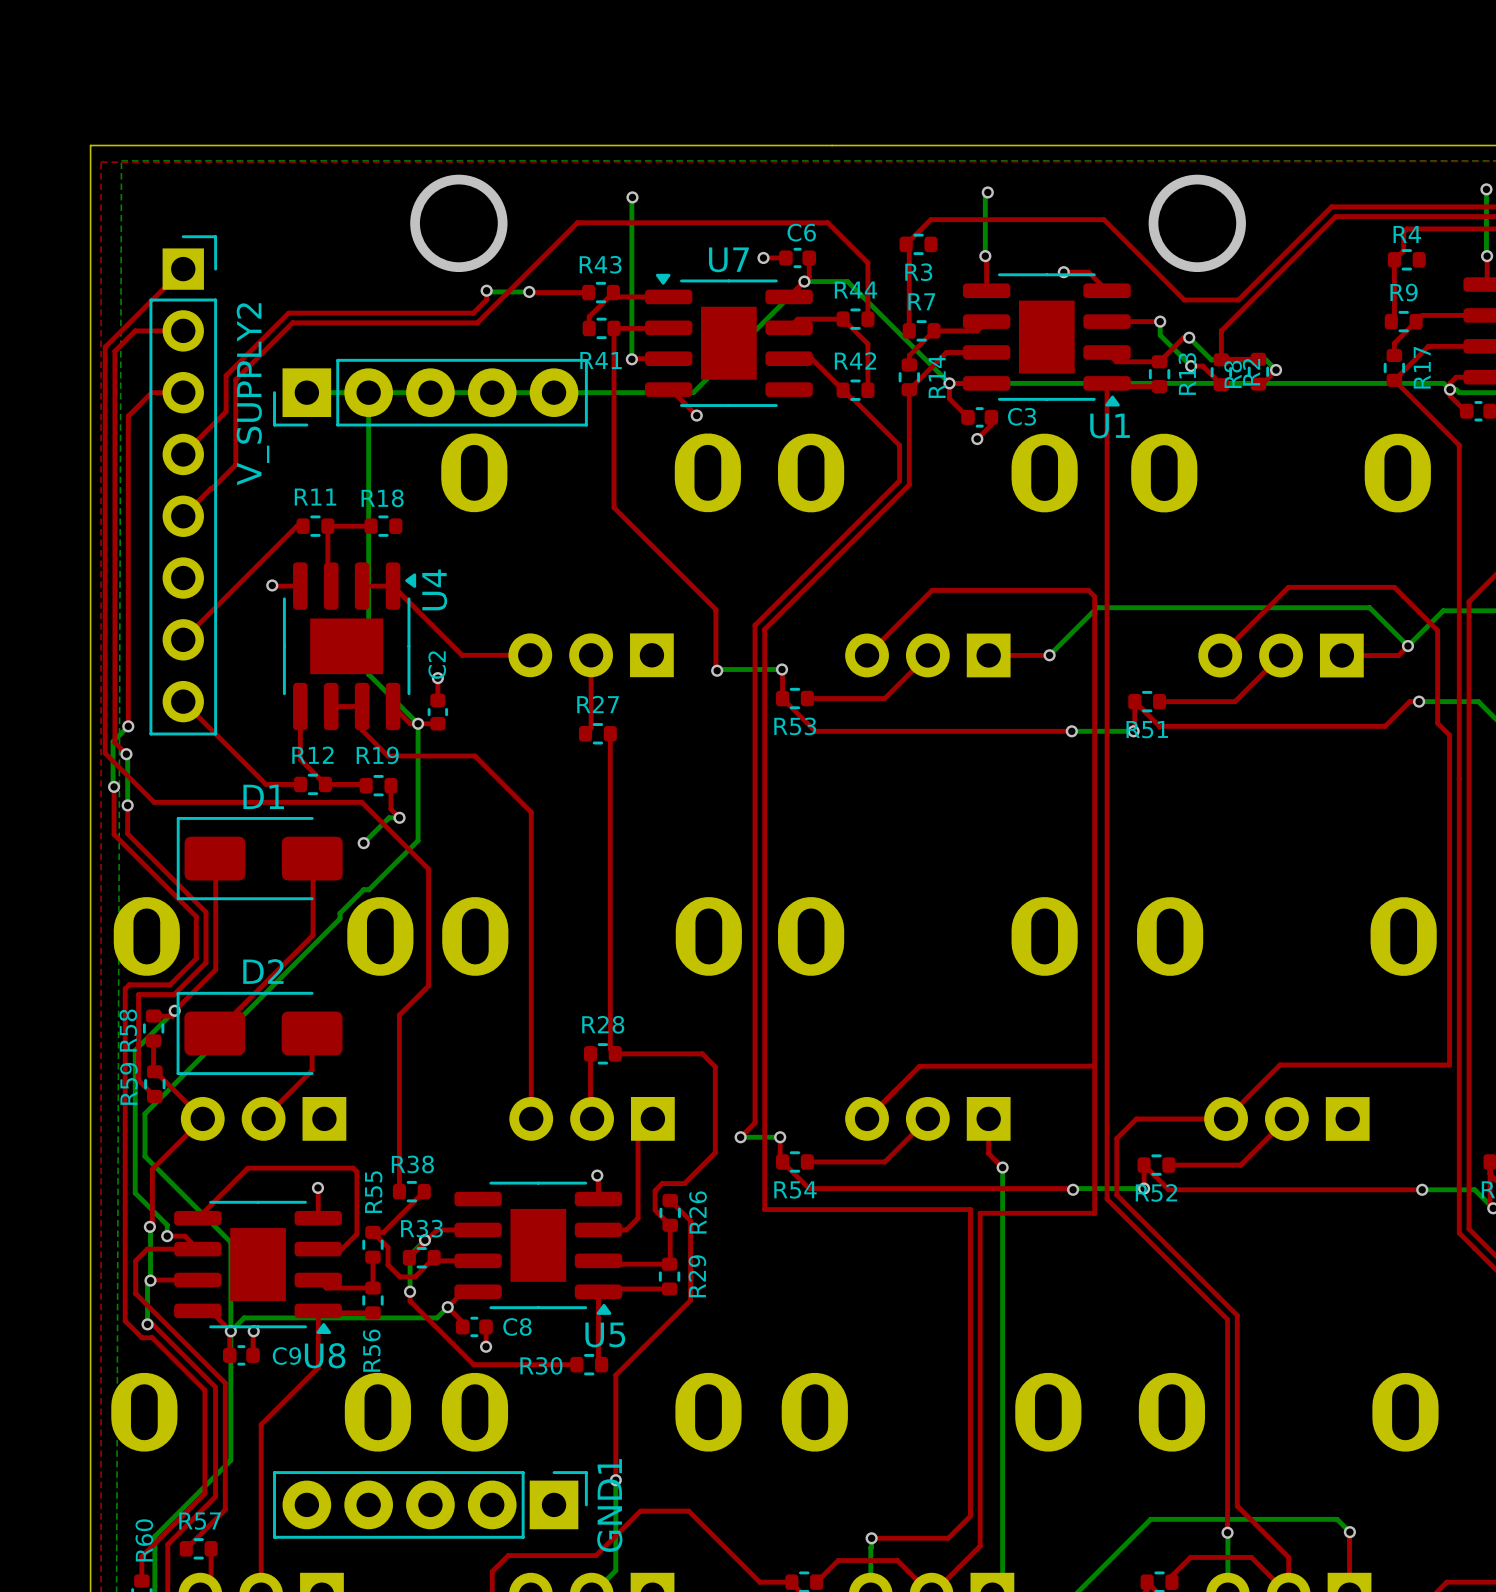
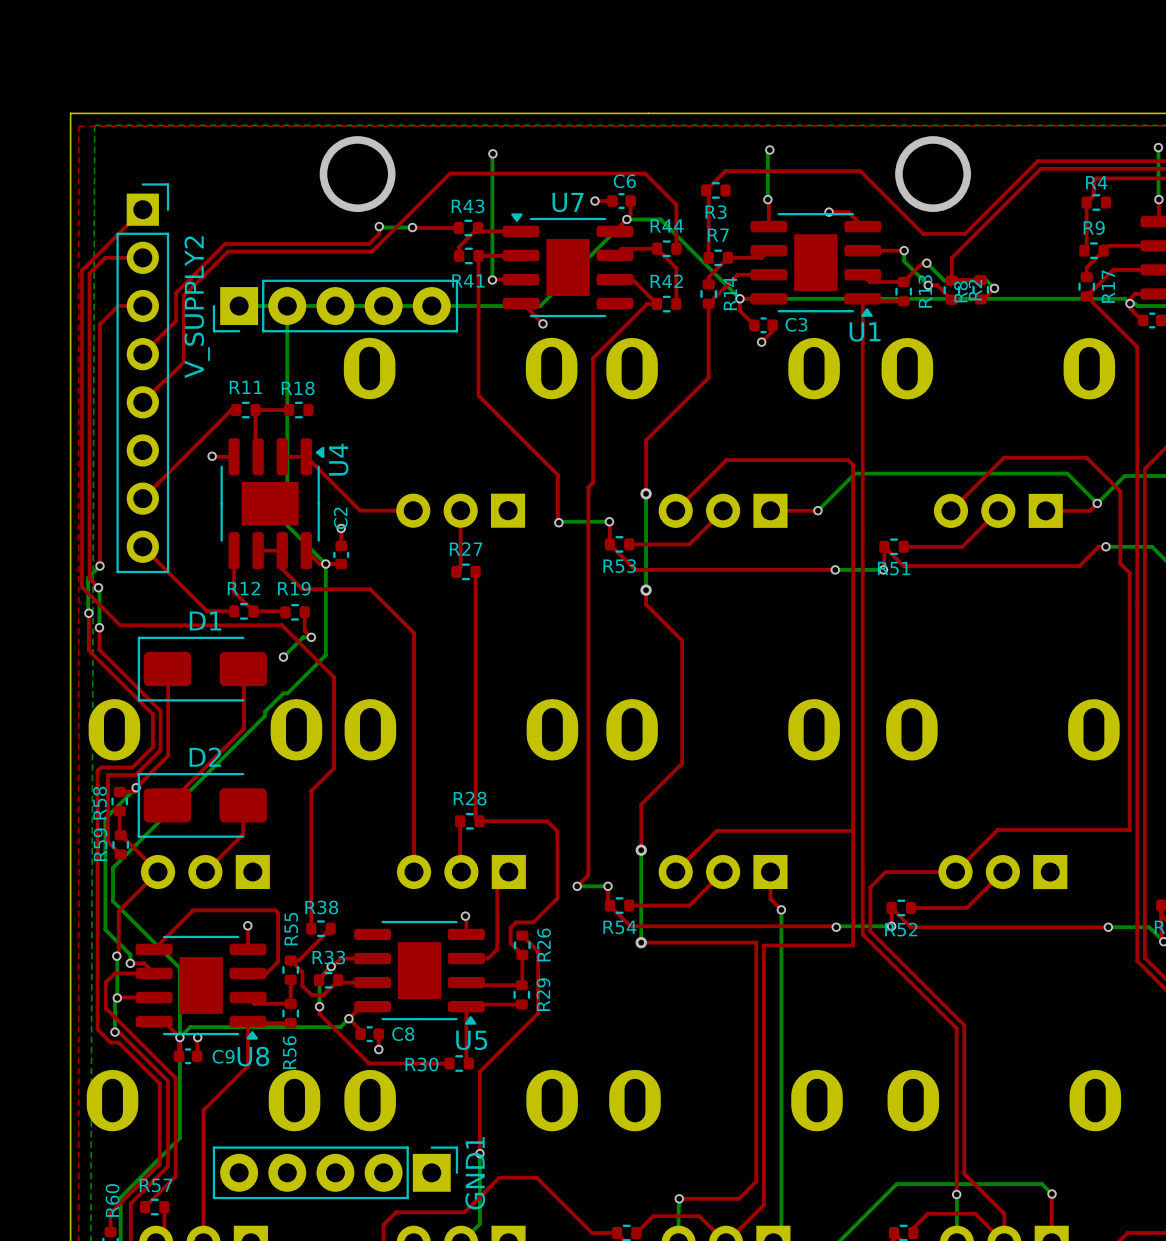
top track: (843, 390) (899, 445) (899, 480) (761, 619) -> (657, 304) (647, 304) (593, 358) (593, 482)
top track: (828, 565) (764, 629) (764, 1209) (822, 1209) -> (646, 440) (646, 493)
bottom track: none -> (646, 493) (646, 590)
via: none -> (646, 493)
top track: none -> (646, 590) (646, 604) (682, 640) (682, 763) (641, 804) (641, 850)
via: none -> (646, 590)
bottom track: none -> (641, 850) (641, 942)
via: none -> (641, 850)
via: none -> (641, 942)

